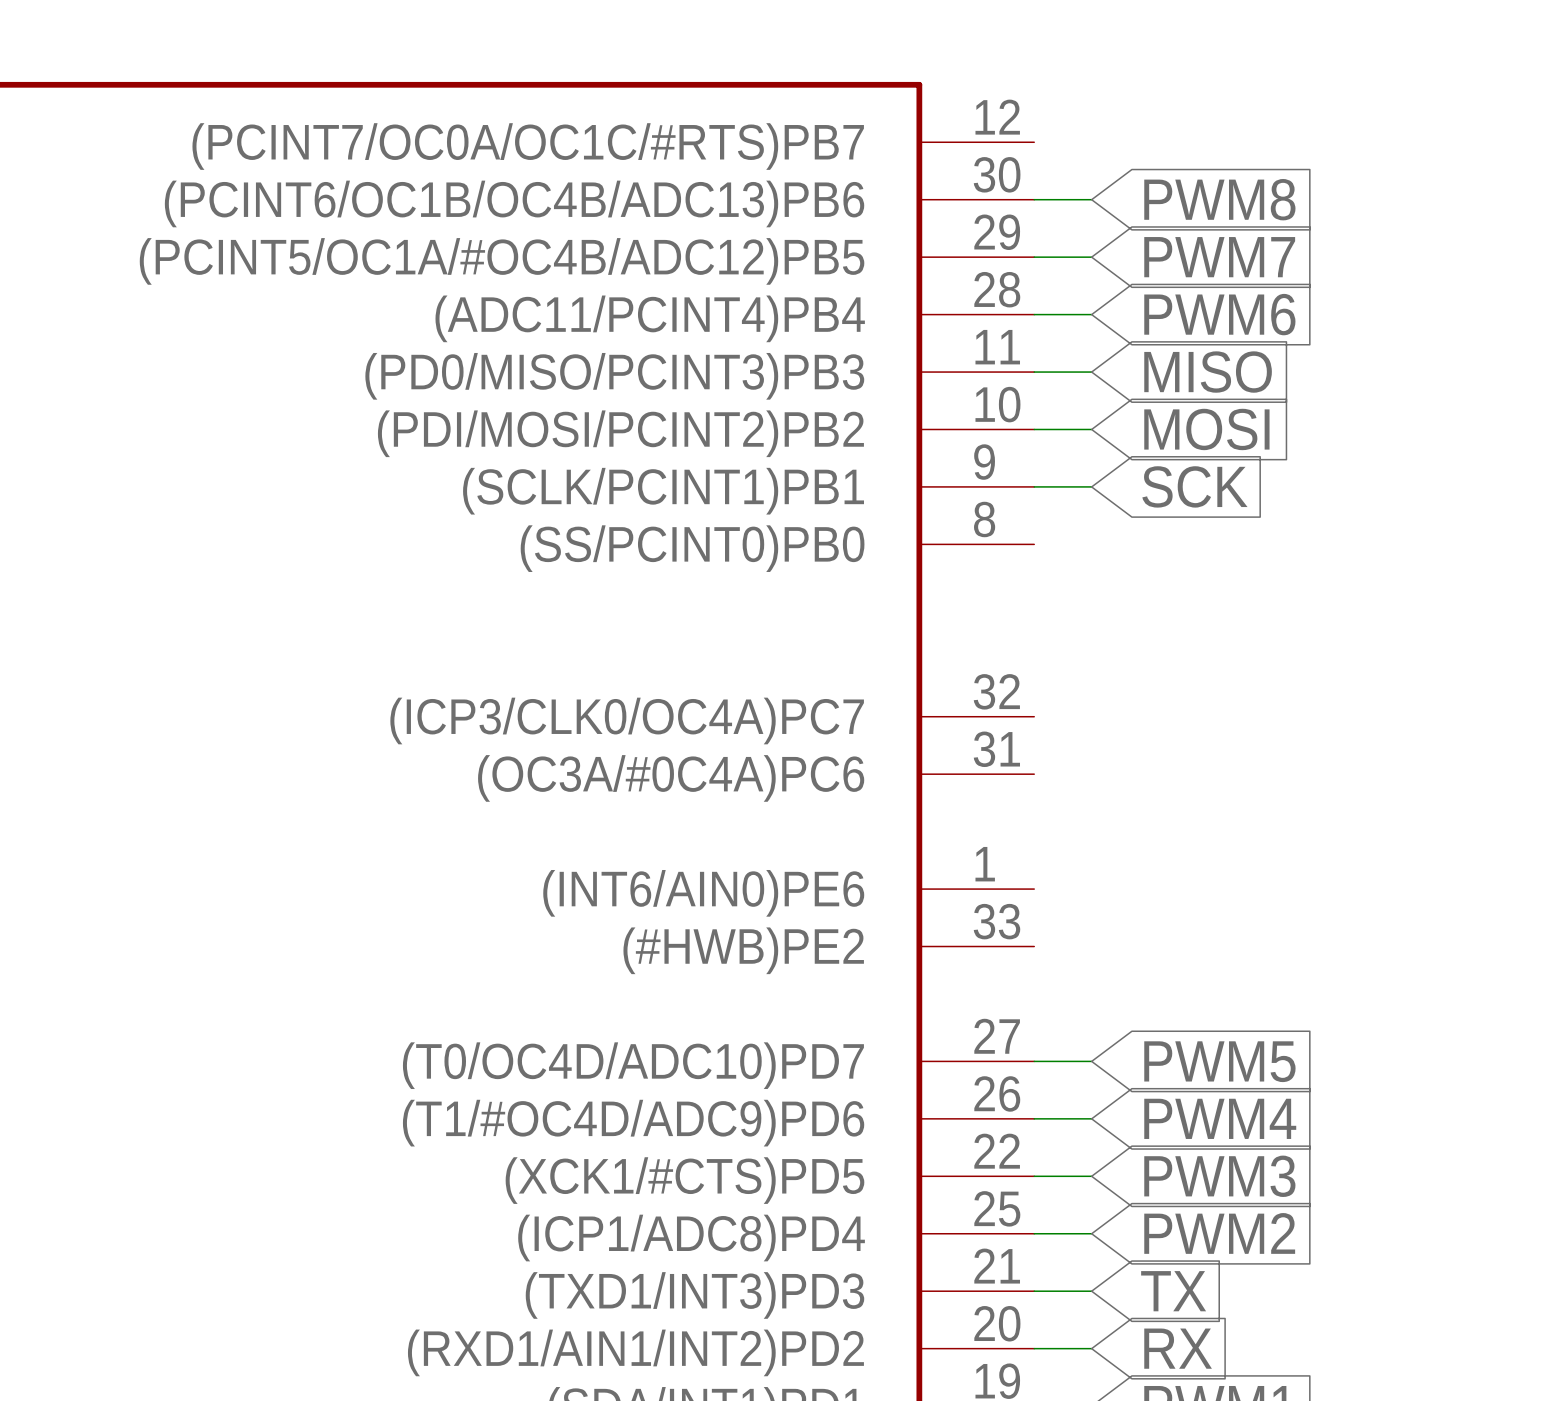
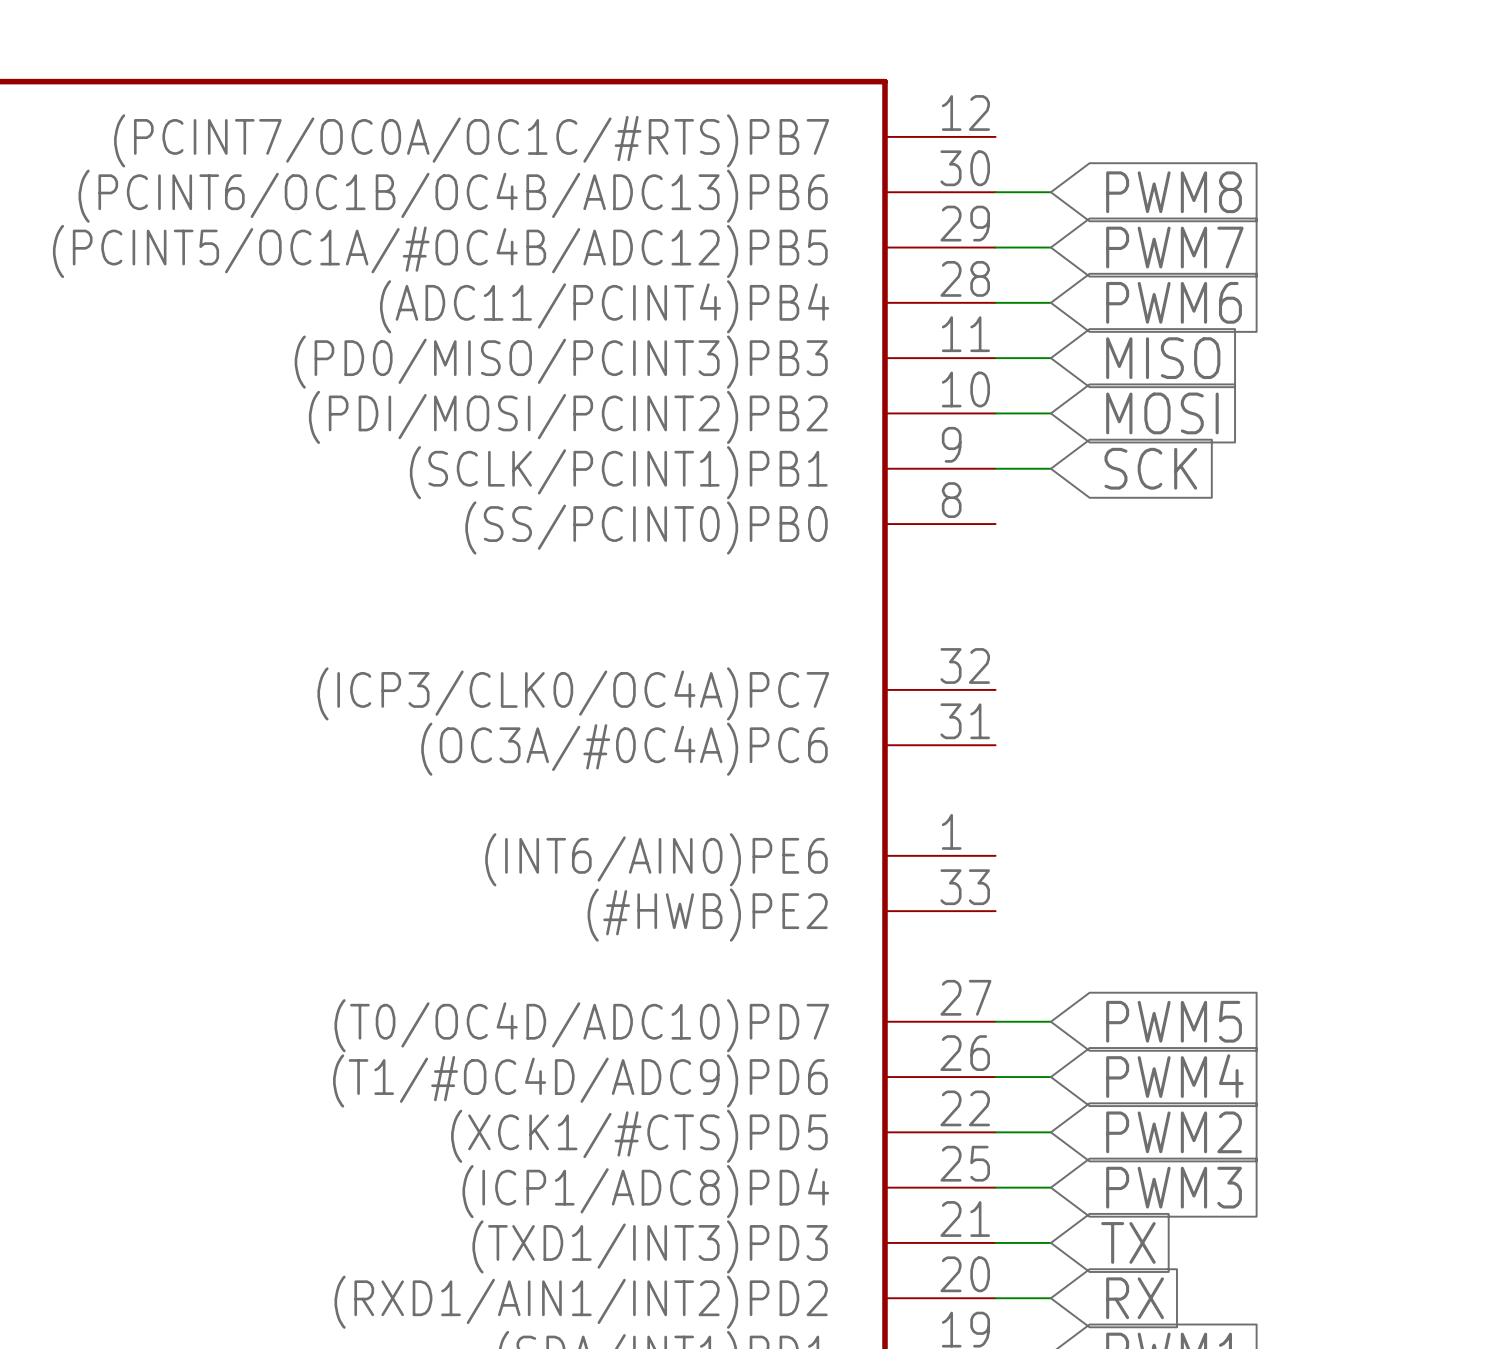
global label: PWM3 (1219, 1176) -> PWM2 (1174, 1132)
global label: PWM2 (1219, 1233) -> PWM3 (1174, 1187)

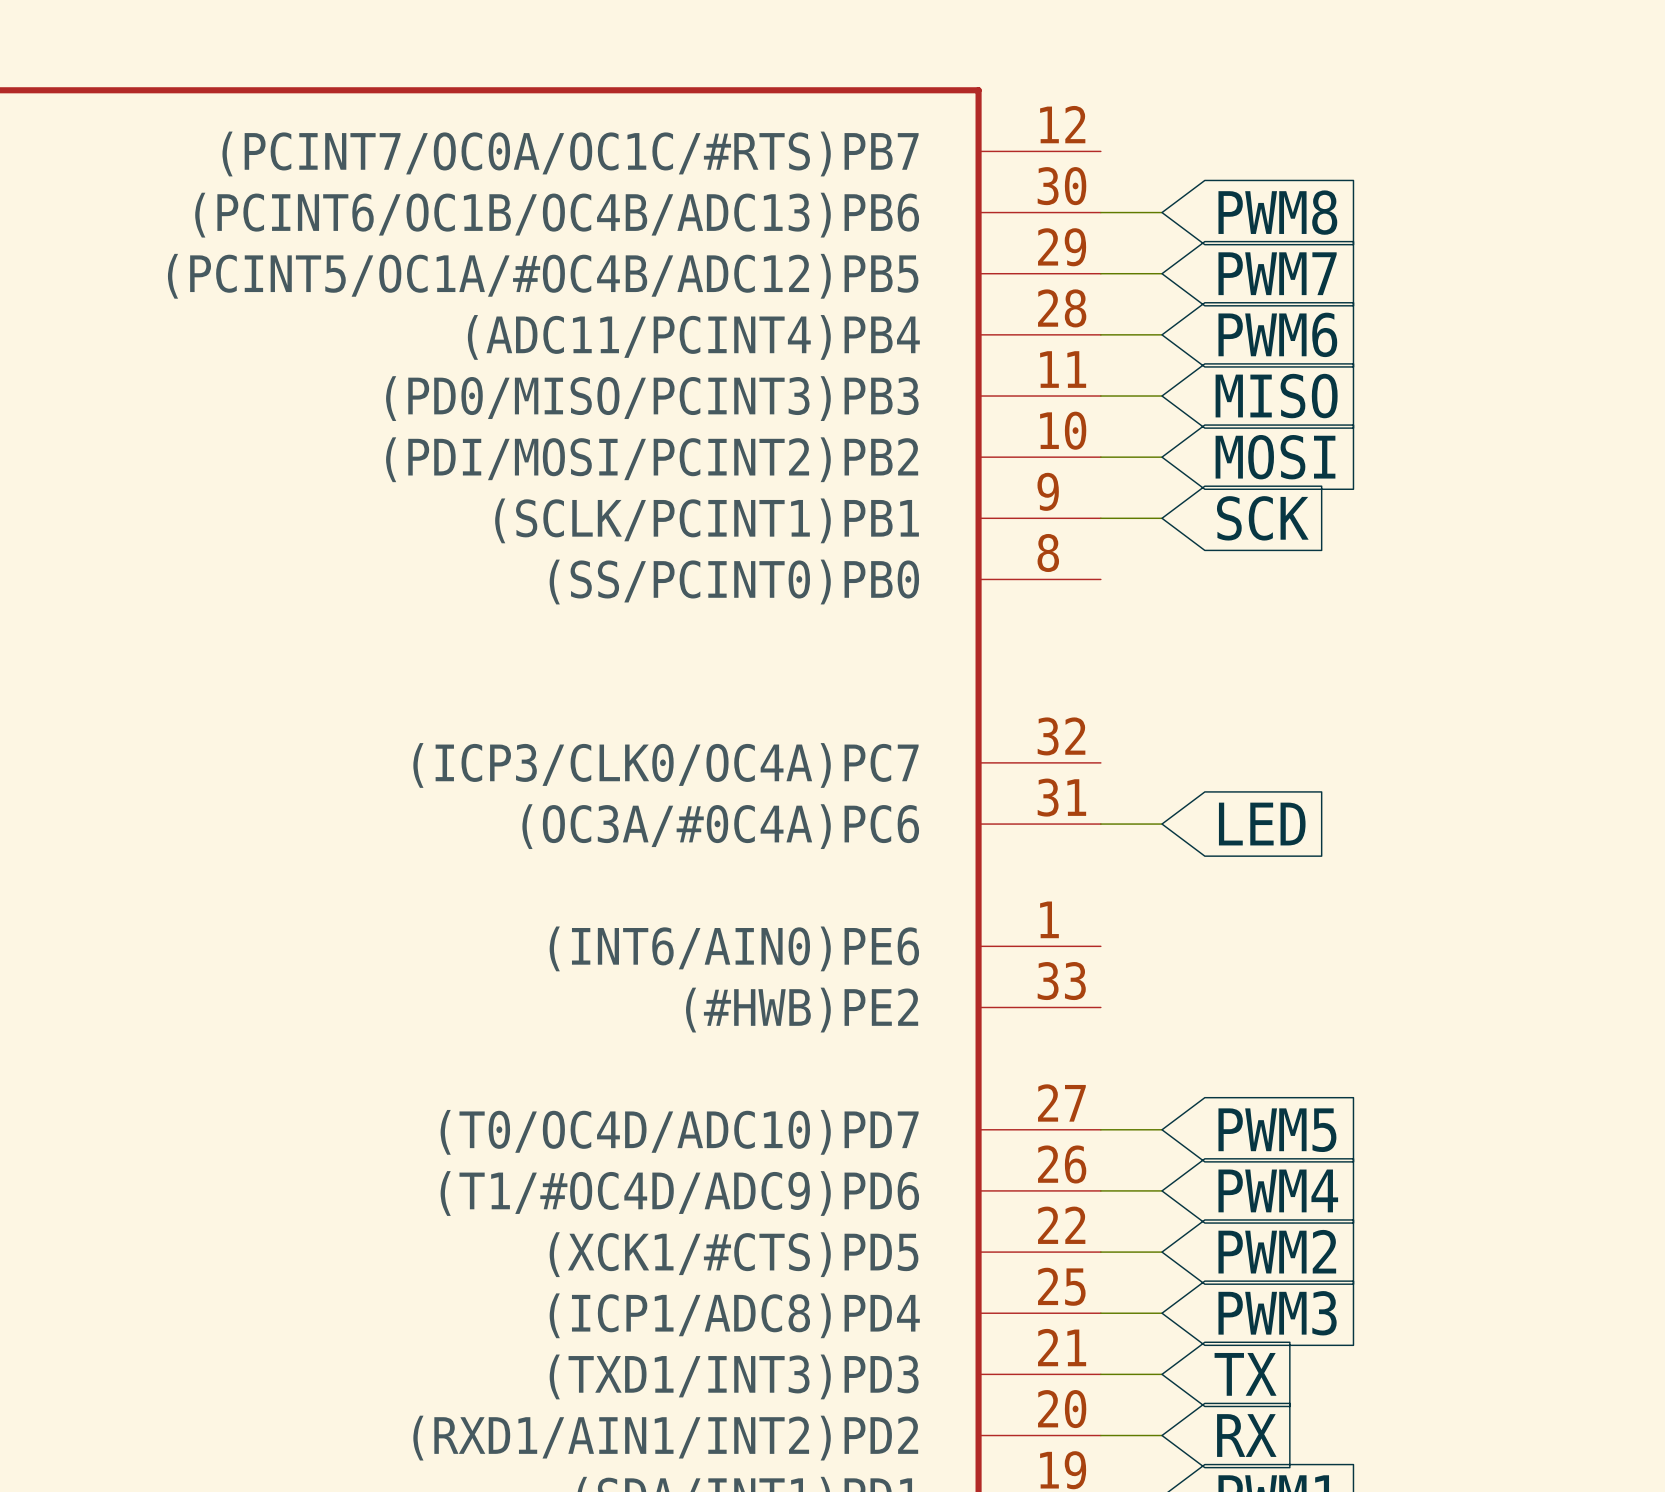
wire: none -> (1100, 824) (1162, 824)
global label: none -> LED (1262, 824)

